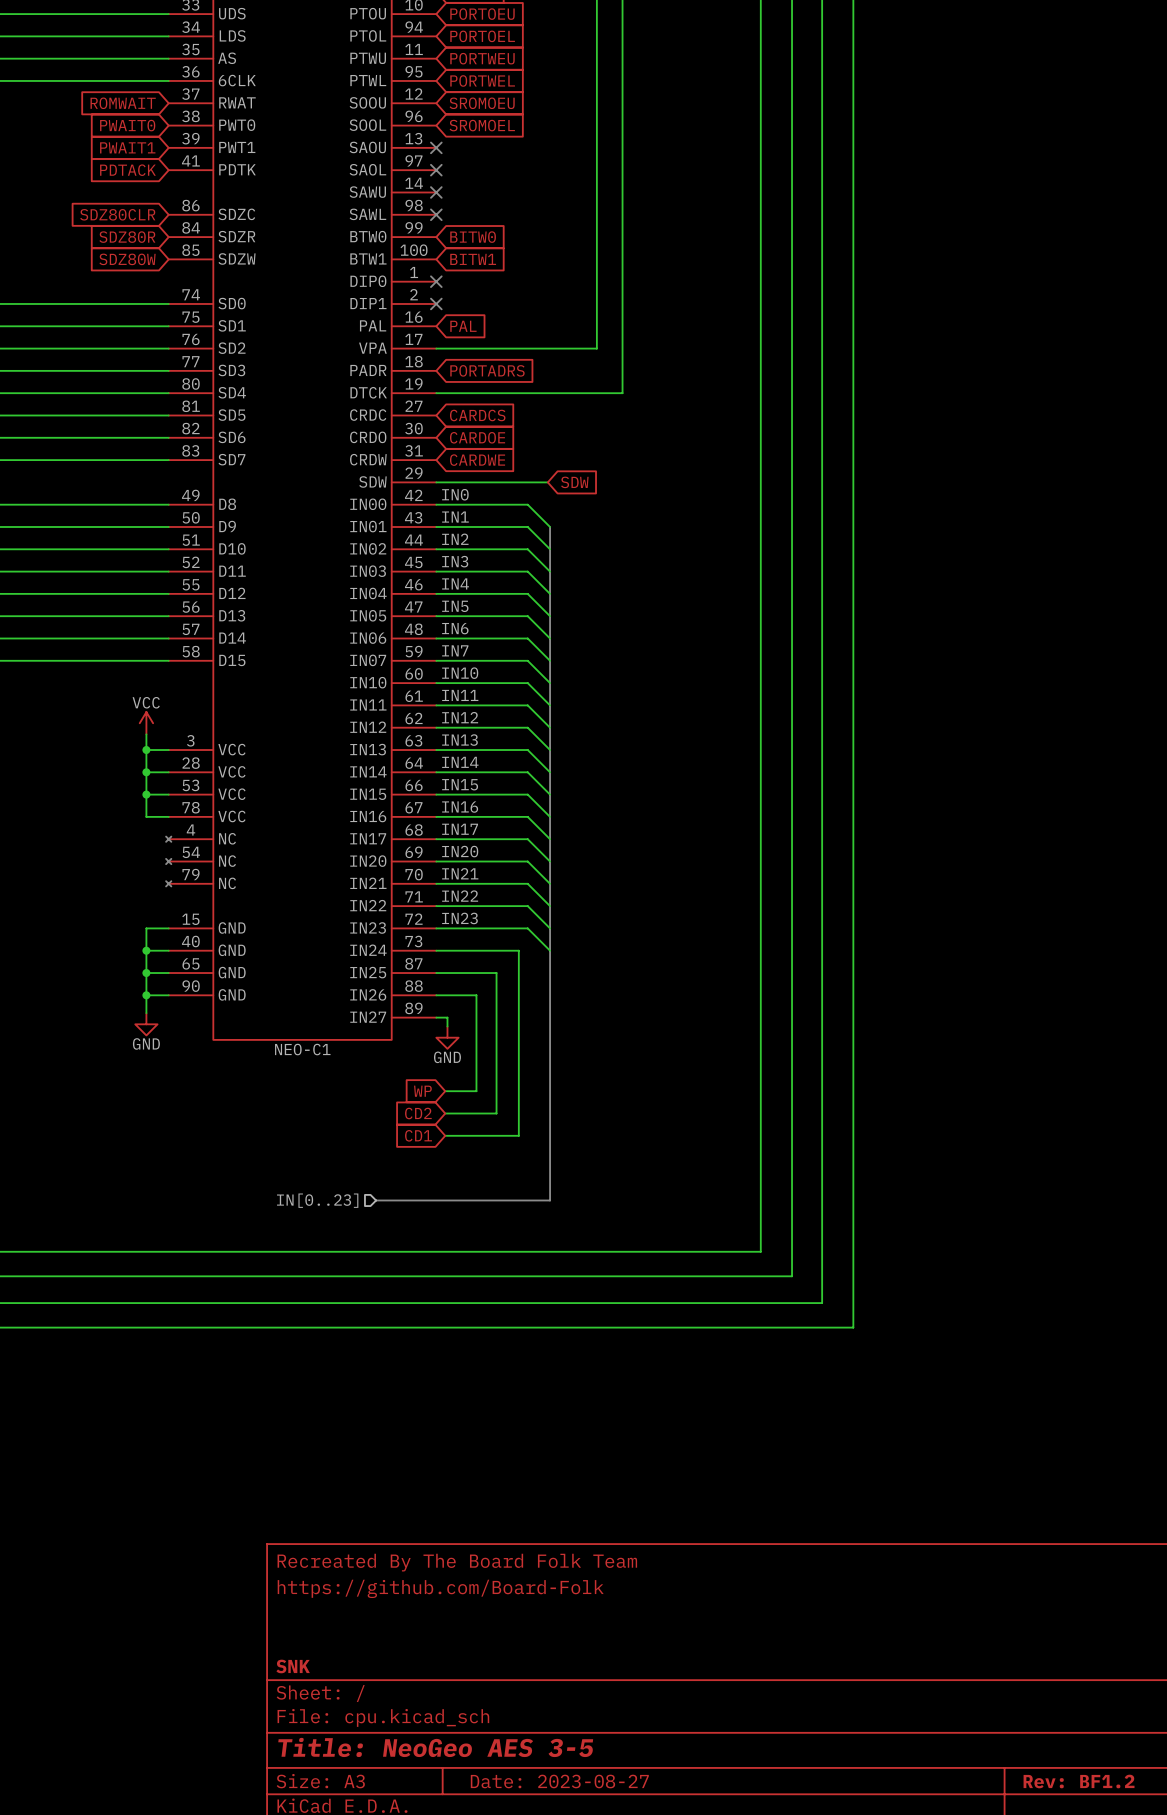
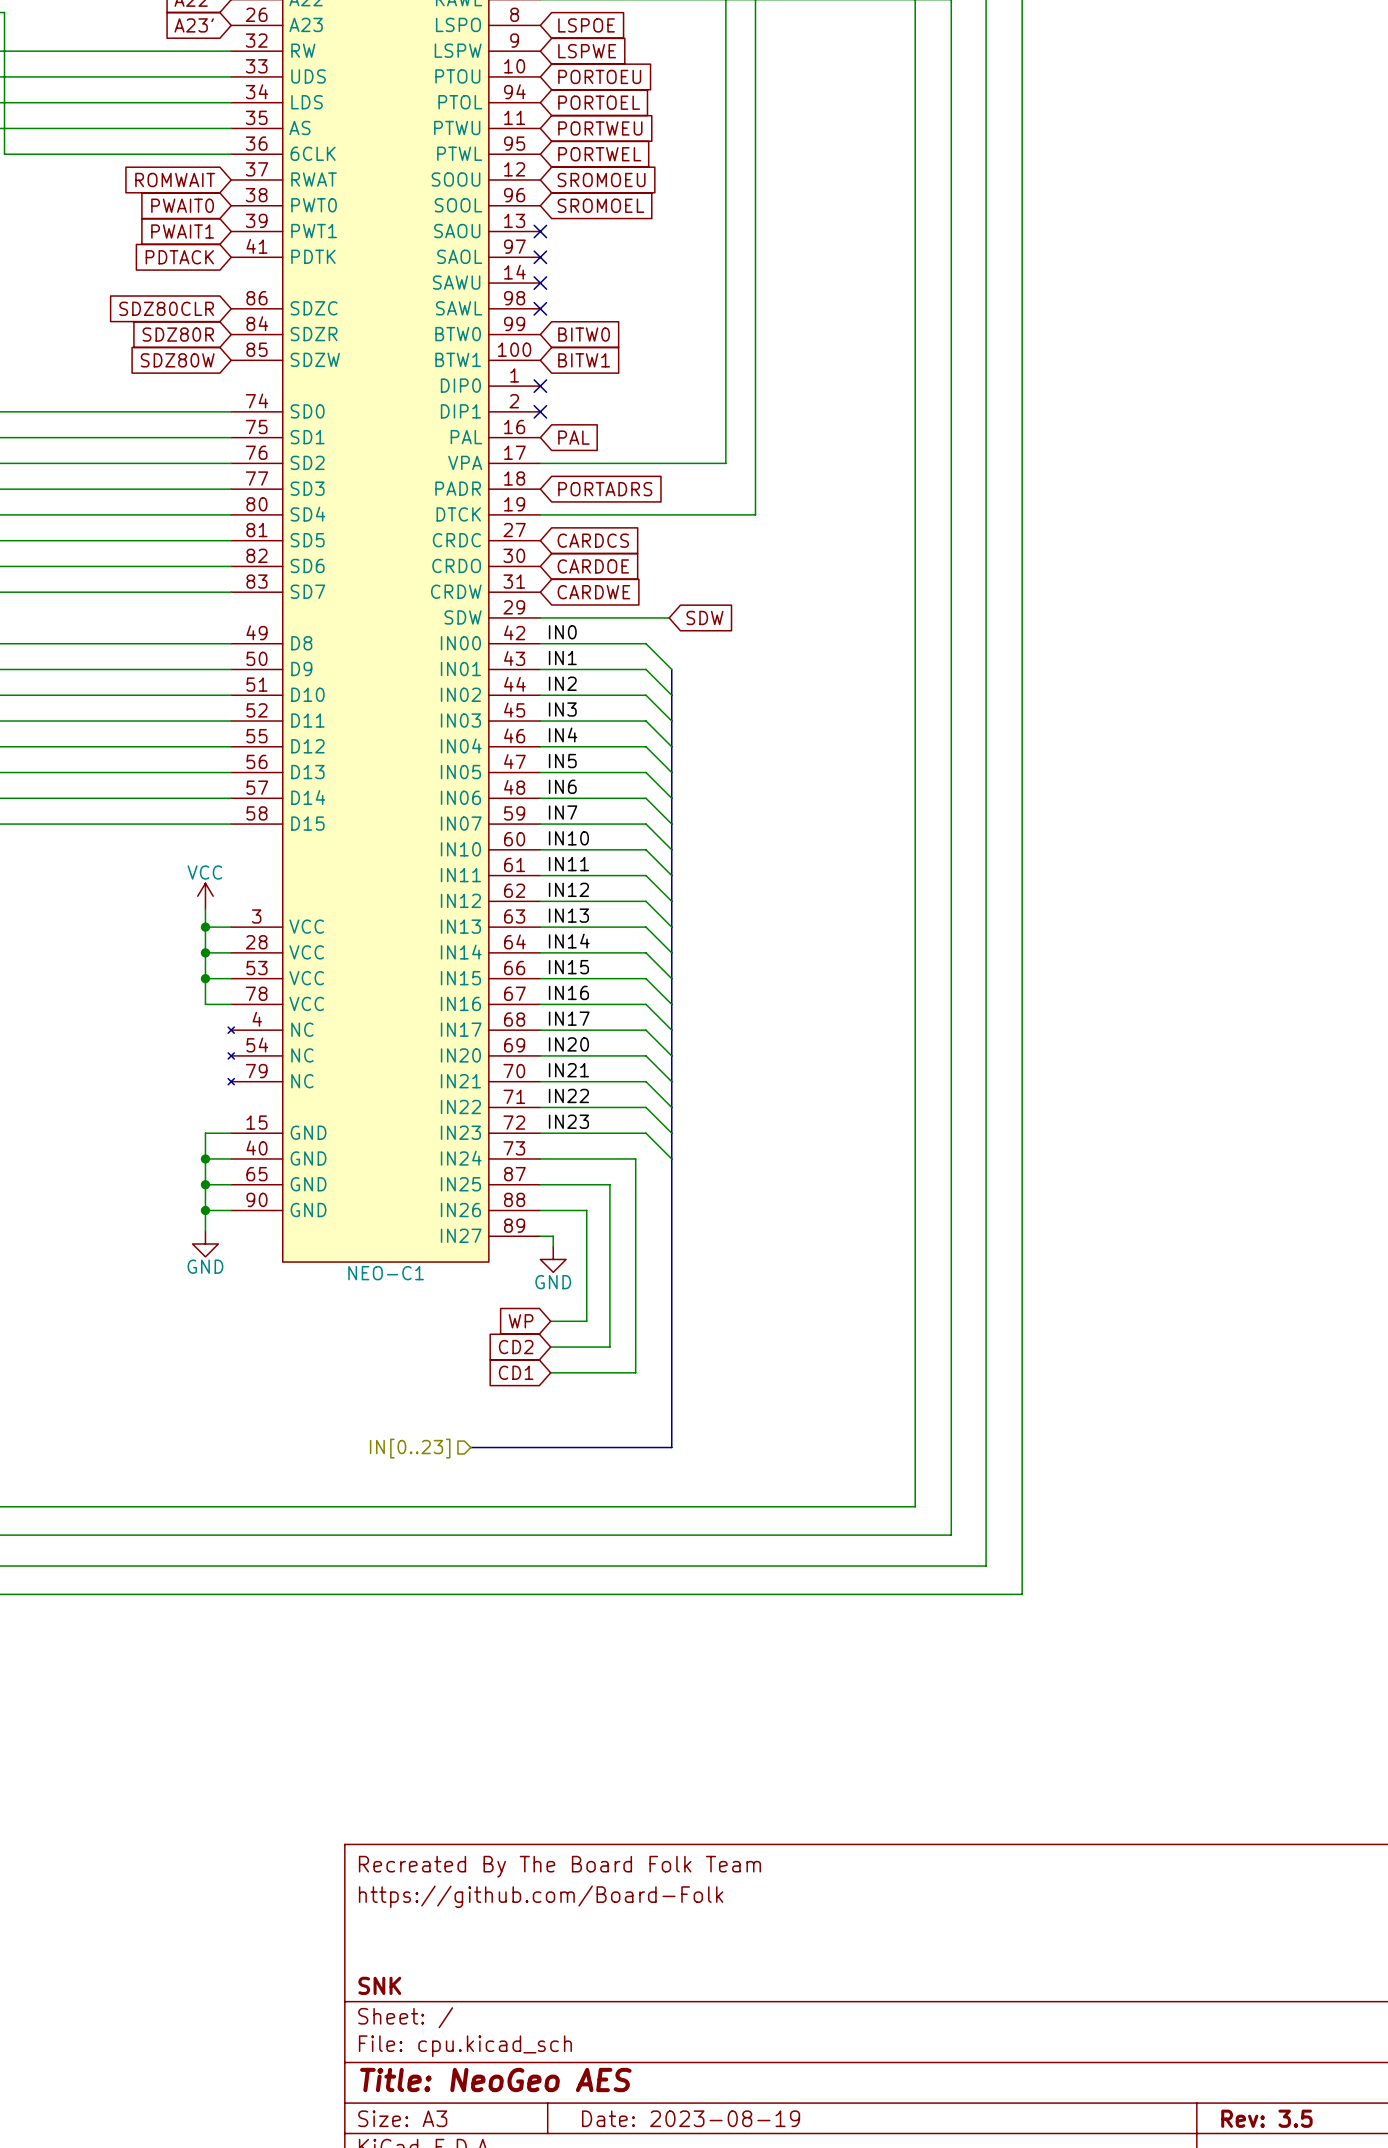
title block: Title: NeoGeo AES 3-5 (435, 1747) -> Title: NeoGeo AES (495, 2080)
title block: Date: 2023-08-27 (559, 1781) -> Date: 2023-08-19 (691, 2118)
title block: Rev: BF1.2 (1079, 1781) -> Rev: 3.5 (1266, 2118)

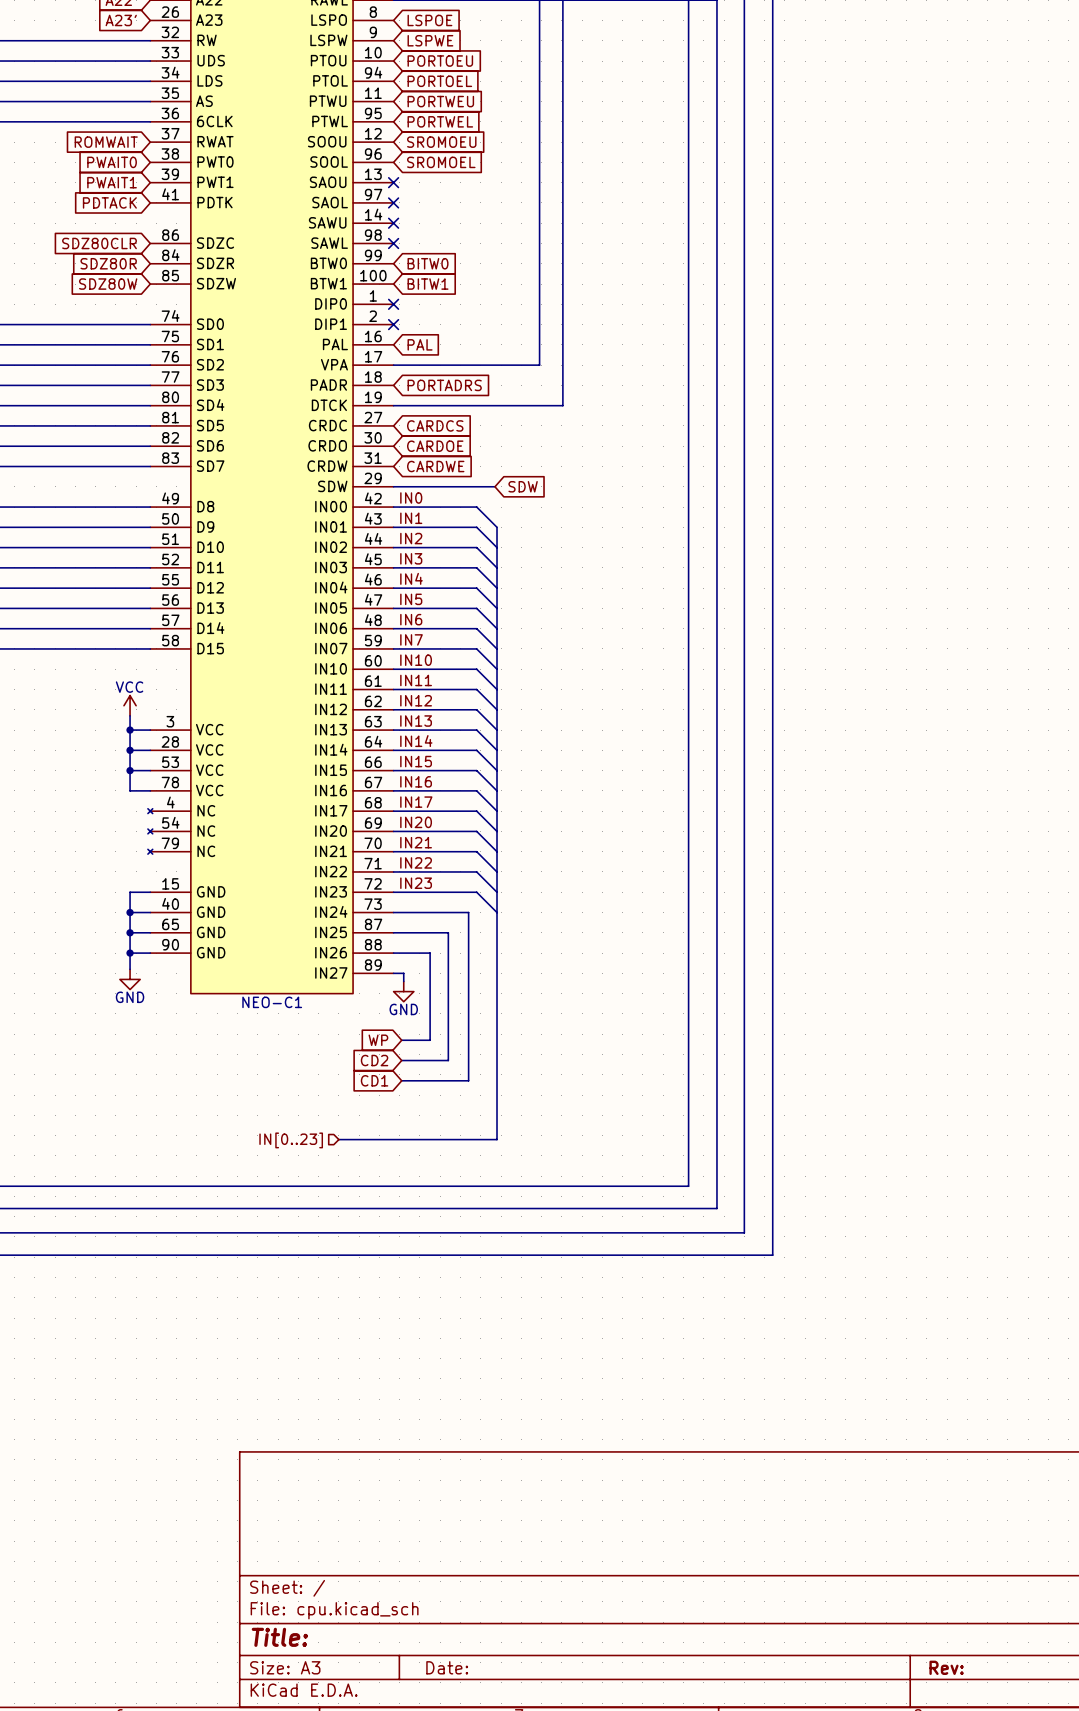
title block: Recreated By The Board Folk Team (559, 1866) -> none
title block: https://github.com/Board-Folk (541, 1896) -> none
title block: SNK (379, 1985) -> none
title block: Title: NeoGeo AES (495, 2080) -> Title: (279, 1637)
title block: Date: 2023-08-19 (691, 2118) -> Date: (447, 1667)
title block: Rev: 3.5 (1266, 2118) -> Rev: (946, 1667)

